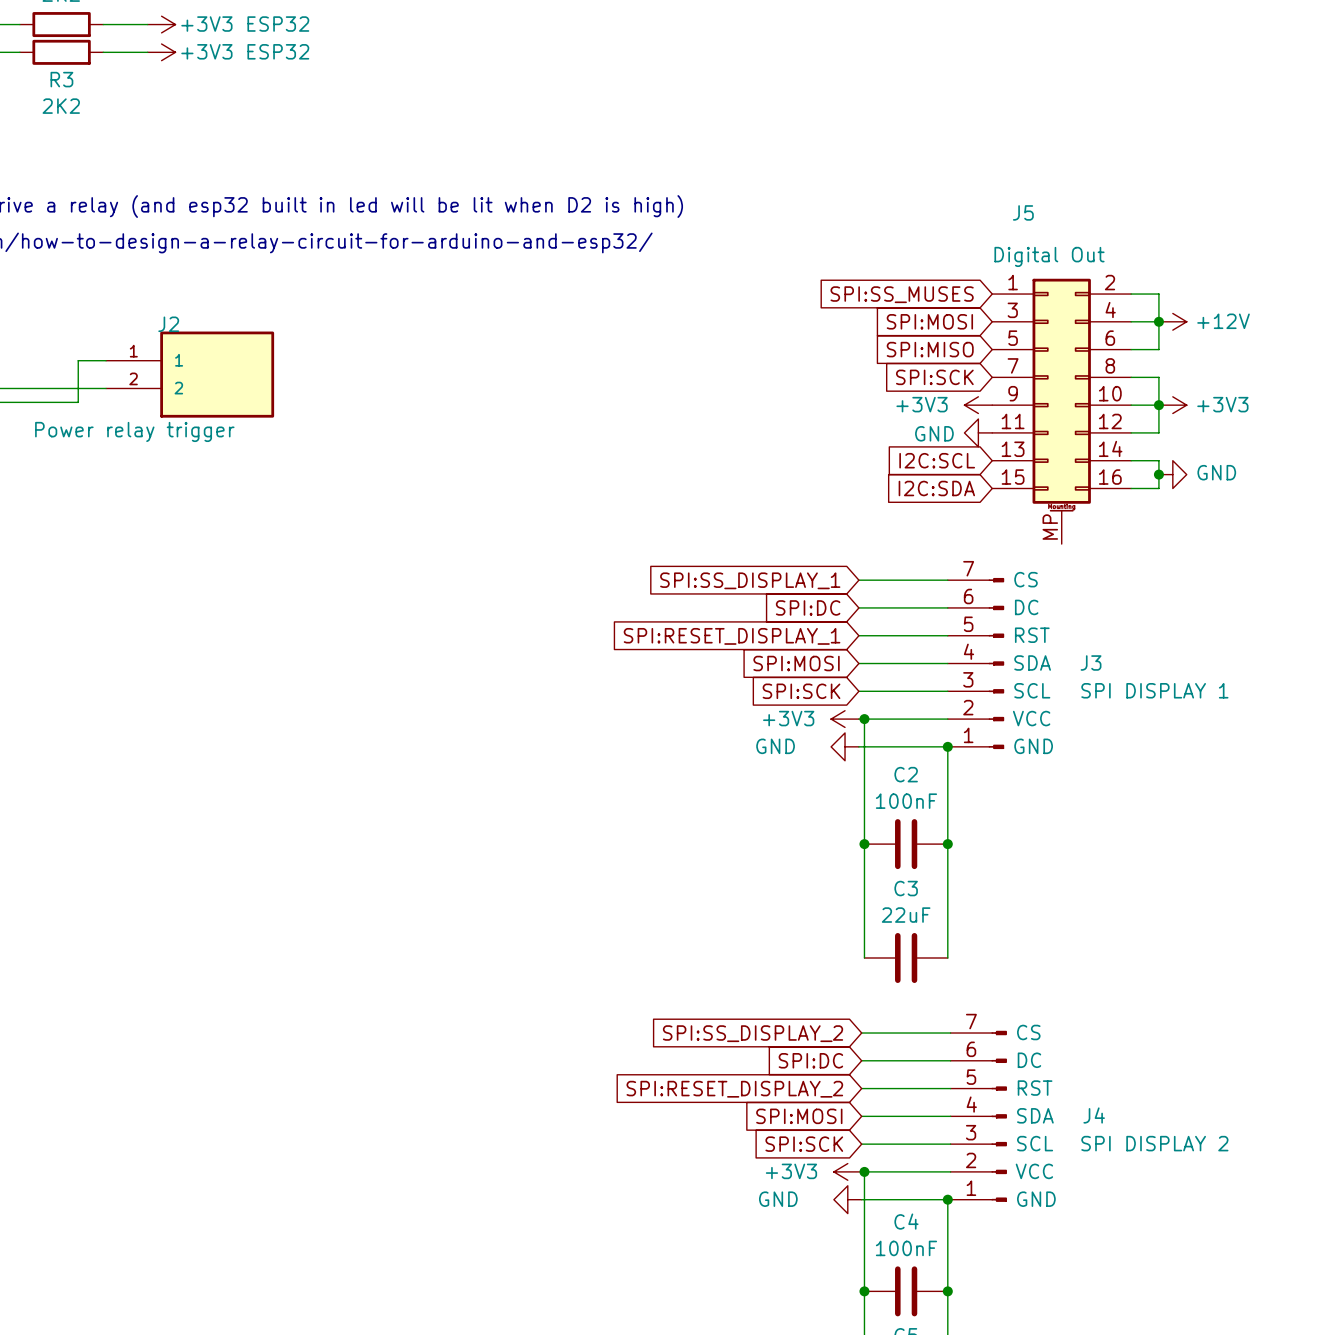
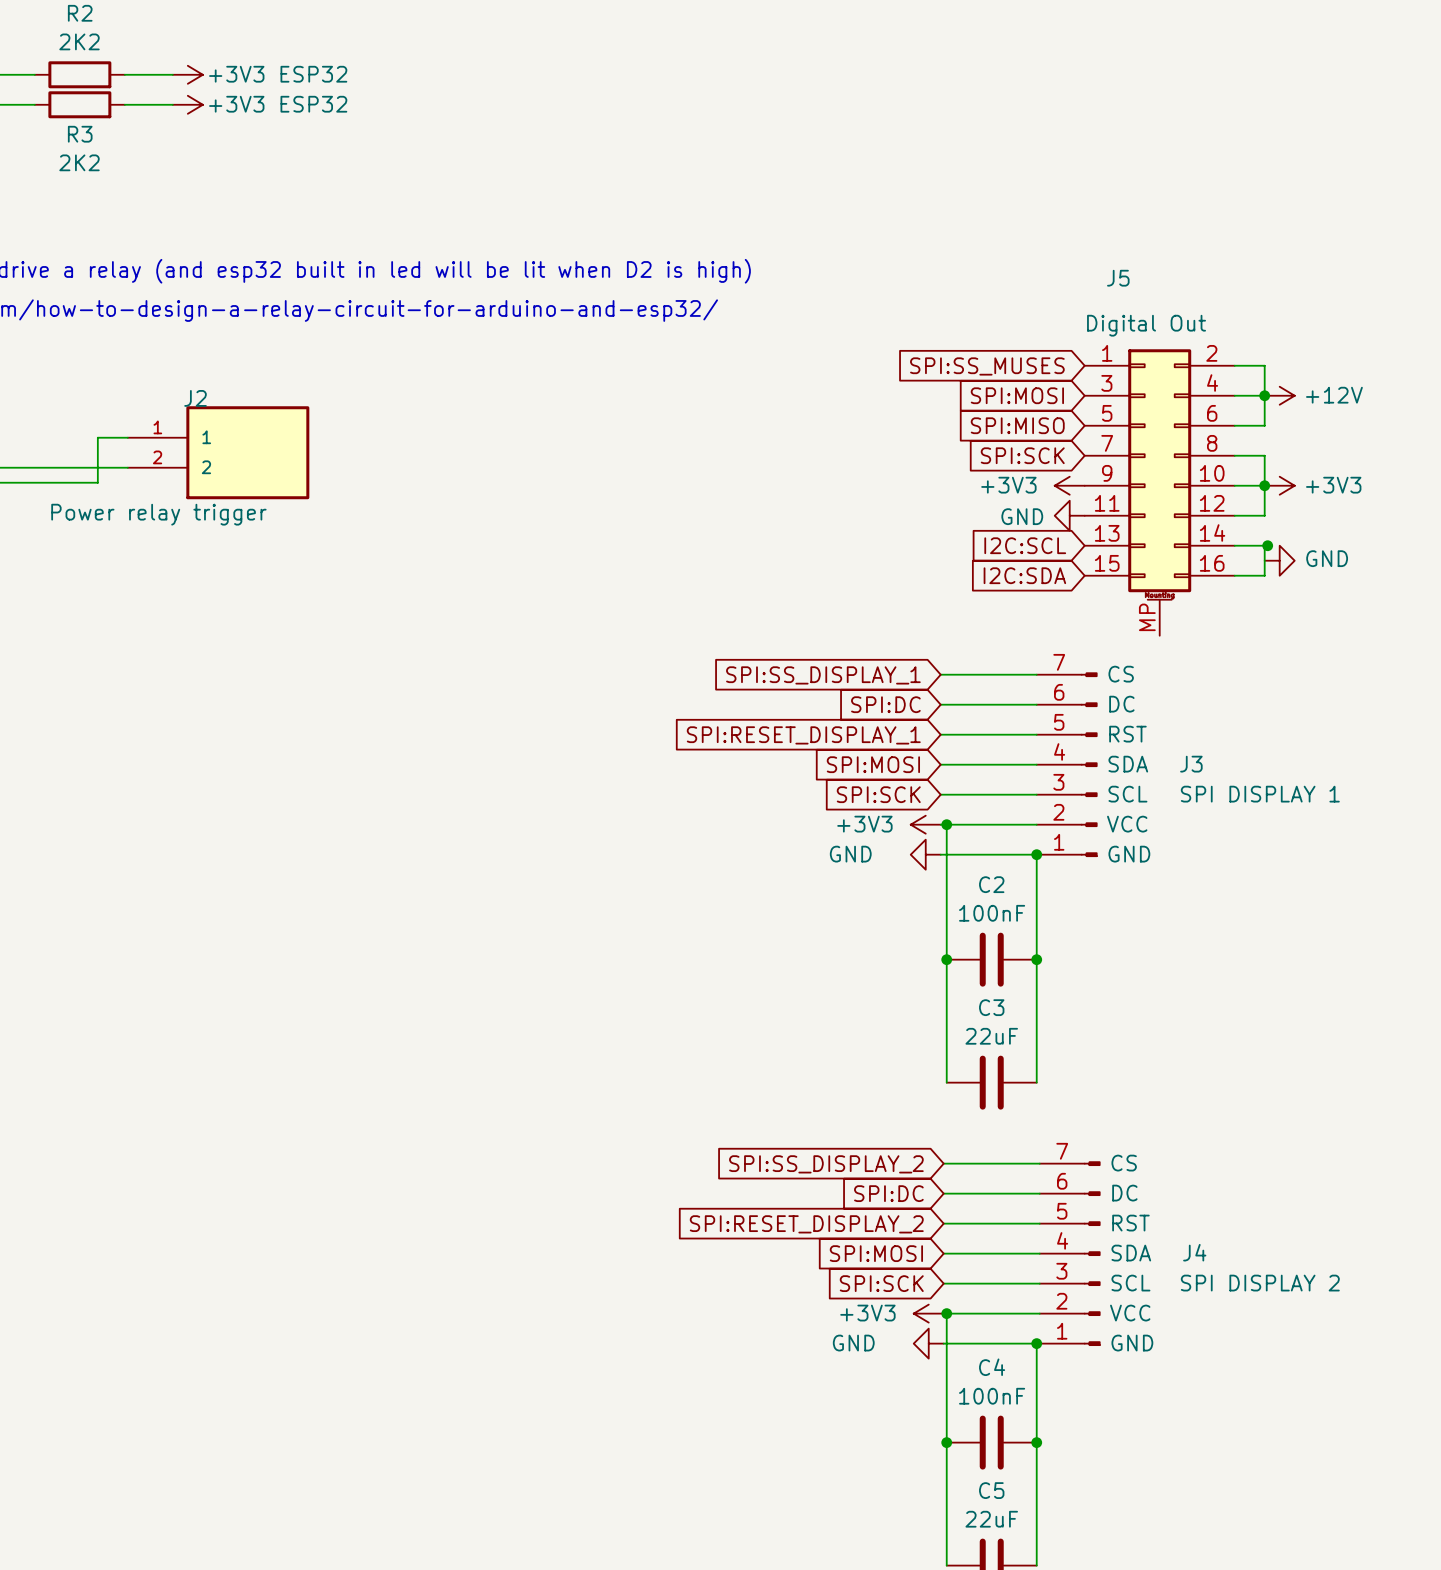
junction position: (1158, 474) -> (1267, 545)

